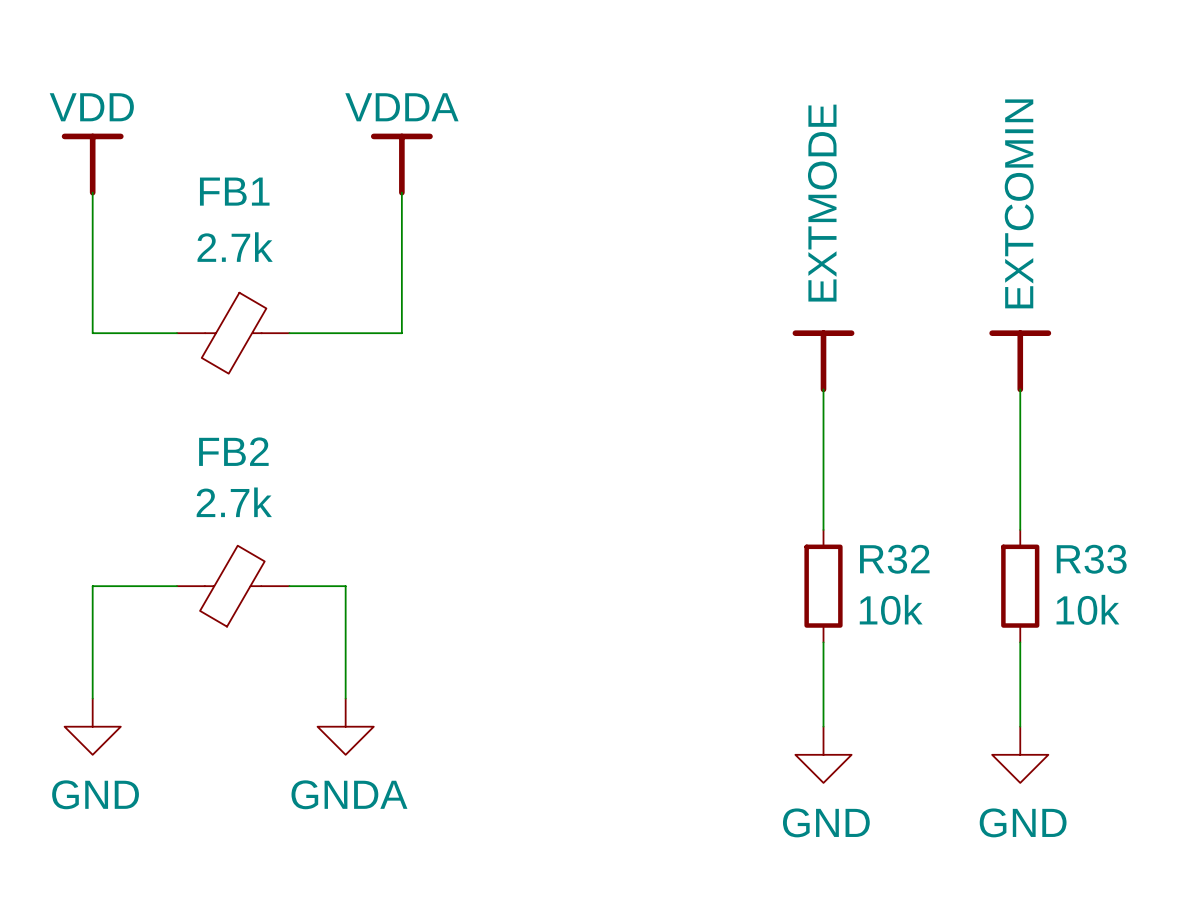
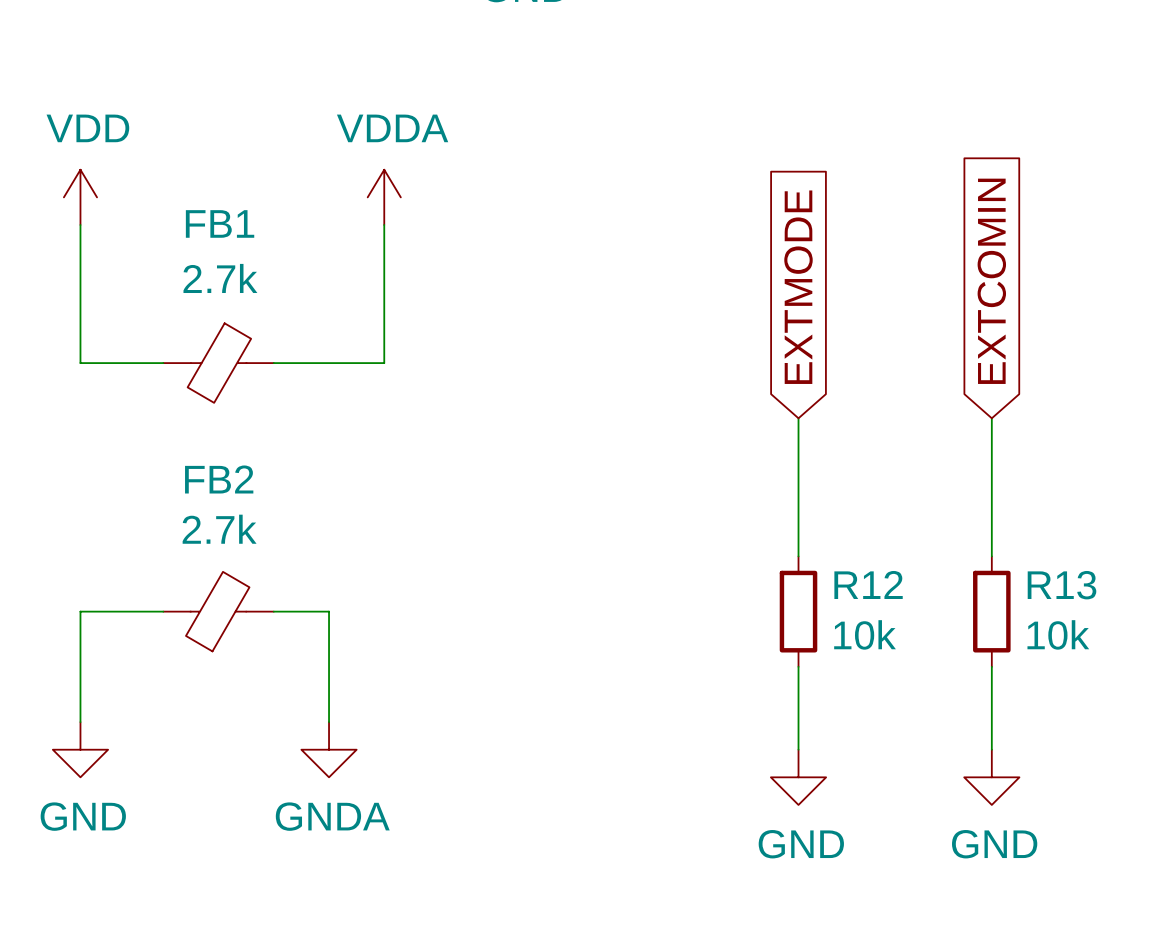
power symbol shape: [61, 133, 124, 196] -> [63, 169, 98, 225]
power symbol shape: [370, 133, 433, 196] -> [367, 169, 401, 225]
global label: none -> EXTCOMIN (991, 281)
global label: none -> EXTMODE (798, 287)
power symbol: EXTMODE (823, 361) -> none
power symbol: EXTCOMIN (1020, 361) -> none
R32 name: R32 (894, 559) -> R12 (868, 584)
R33 name: R33 (1091, 559) -> R13 (1062, 585)

